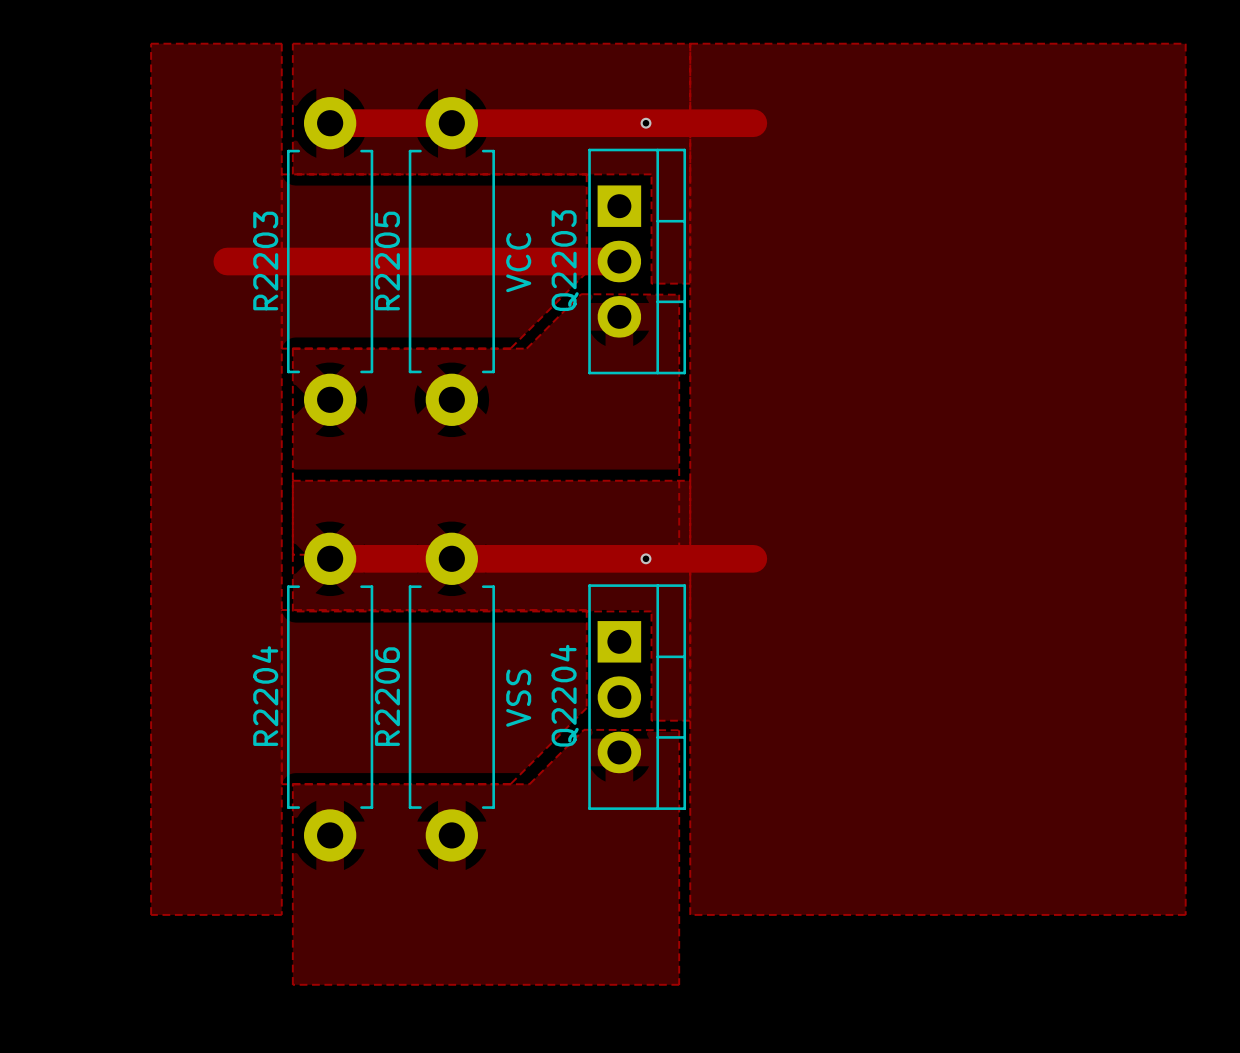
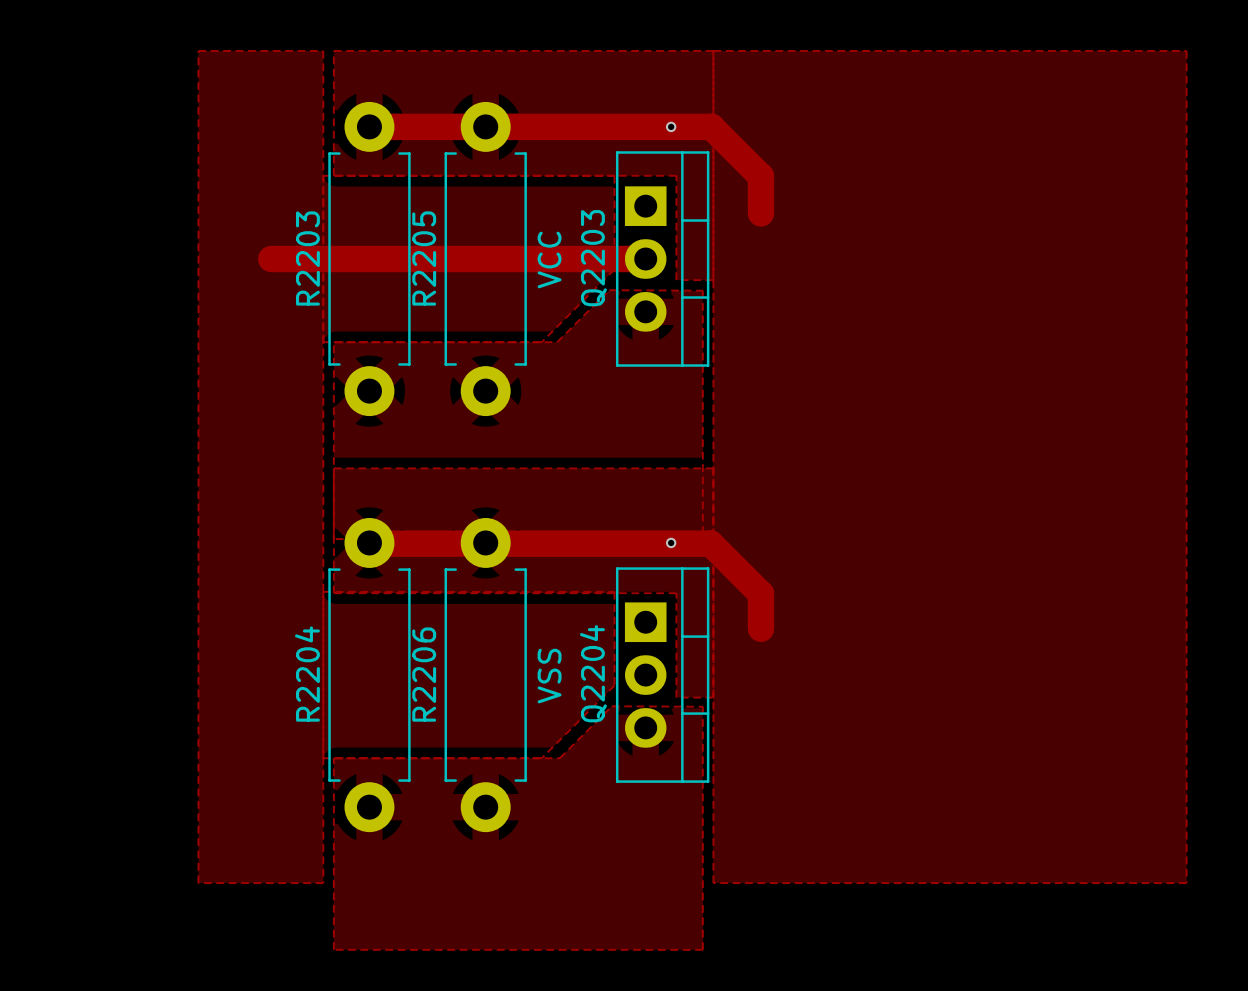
track: (688, 123) (753, 123) -> (711, 126) (760, 176) (760, 213)
track: (330, 558) (753, 558) -> (369, 542) (710, 543) (760, 593) (760, 628)

